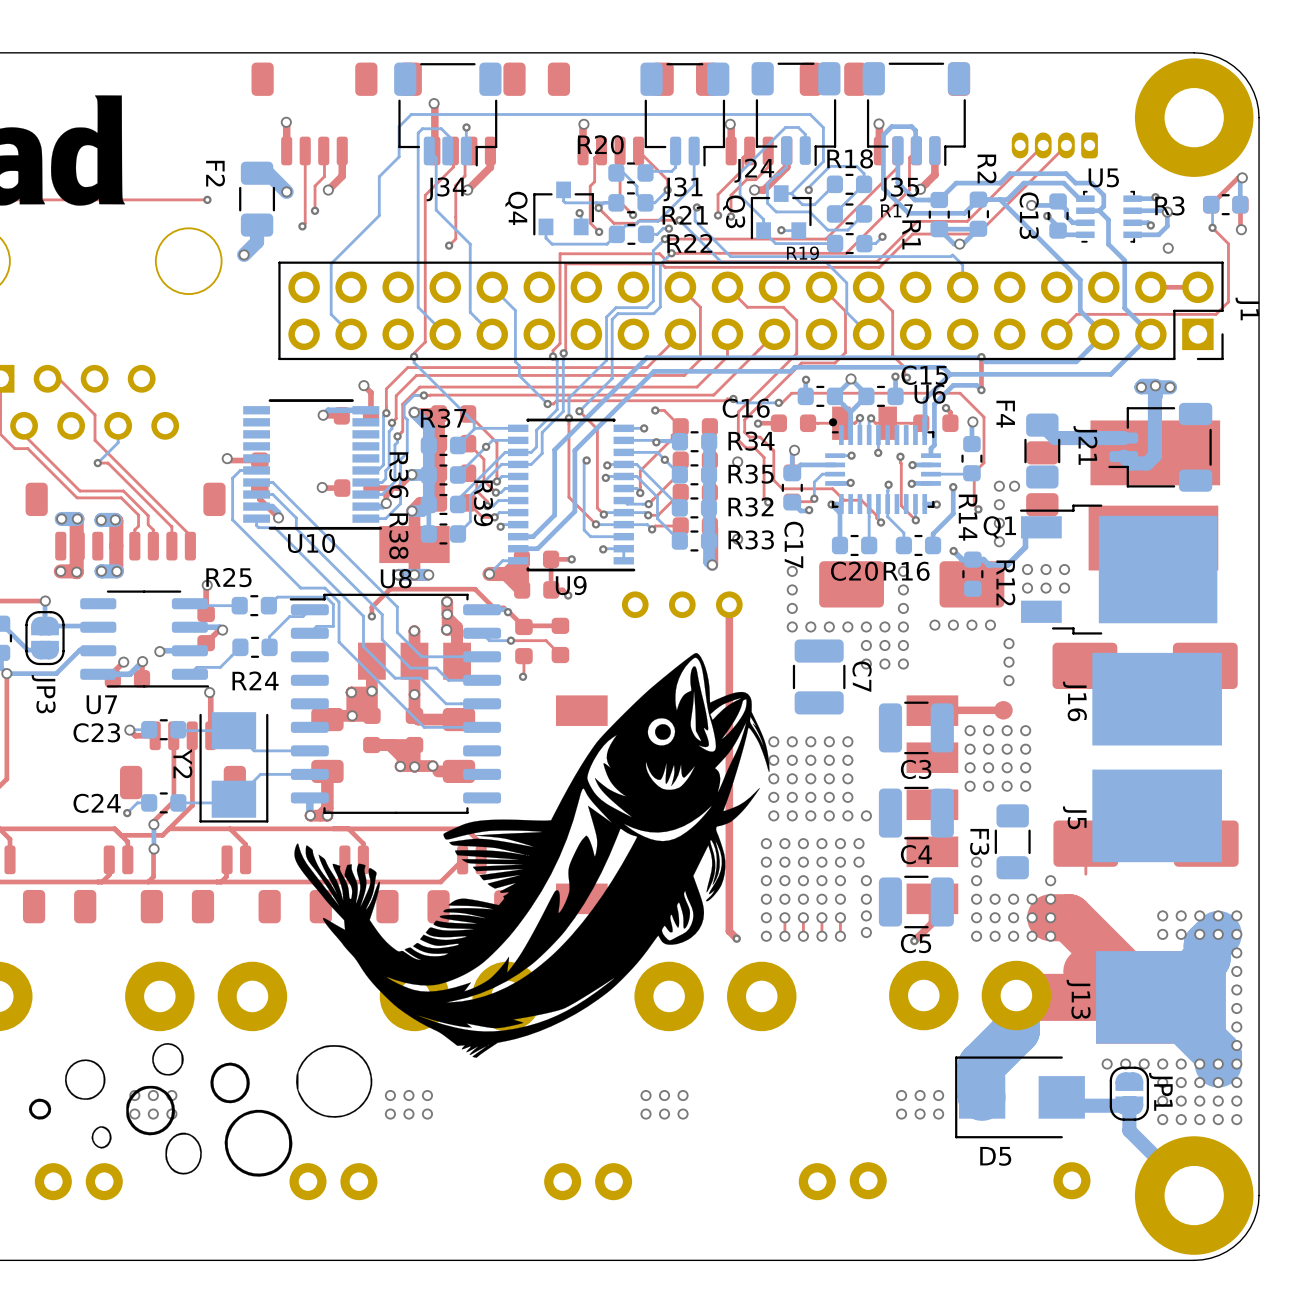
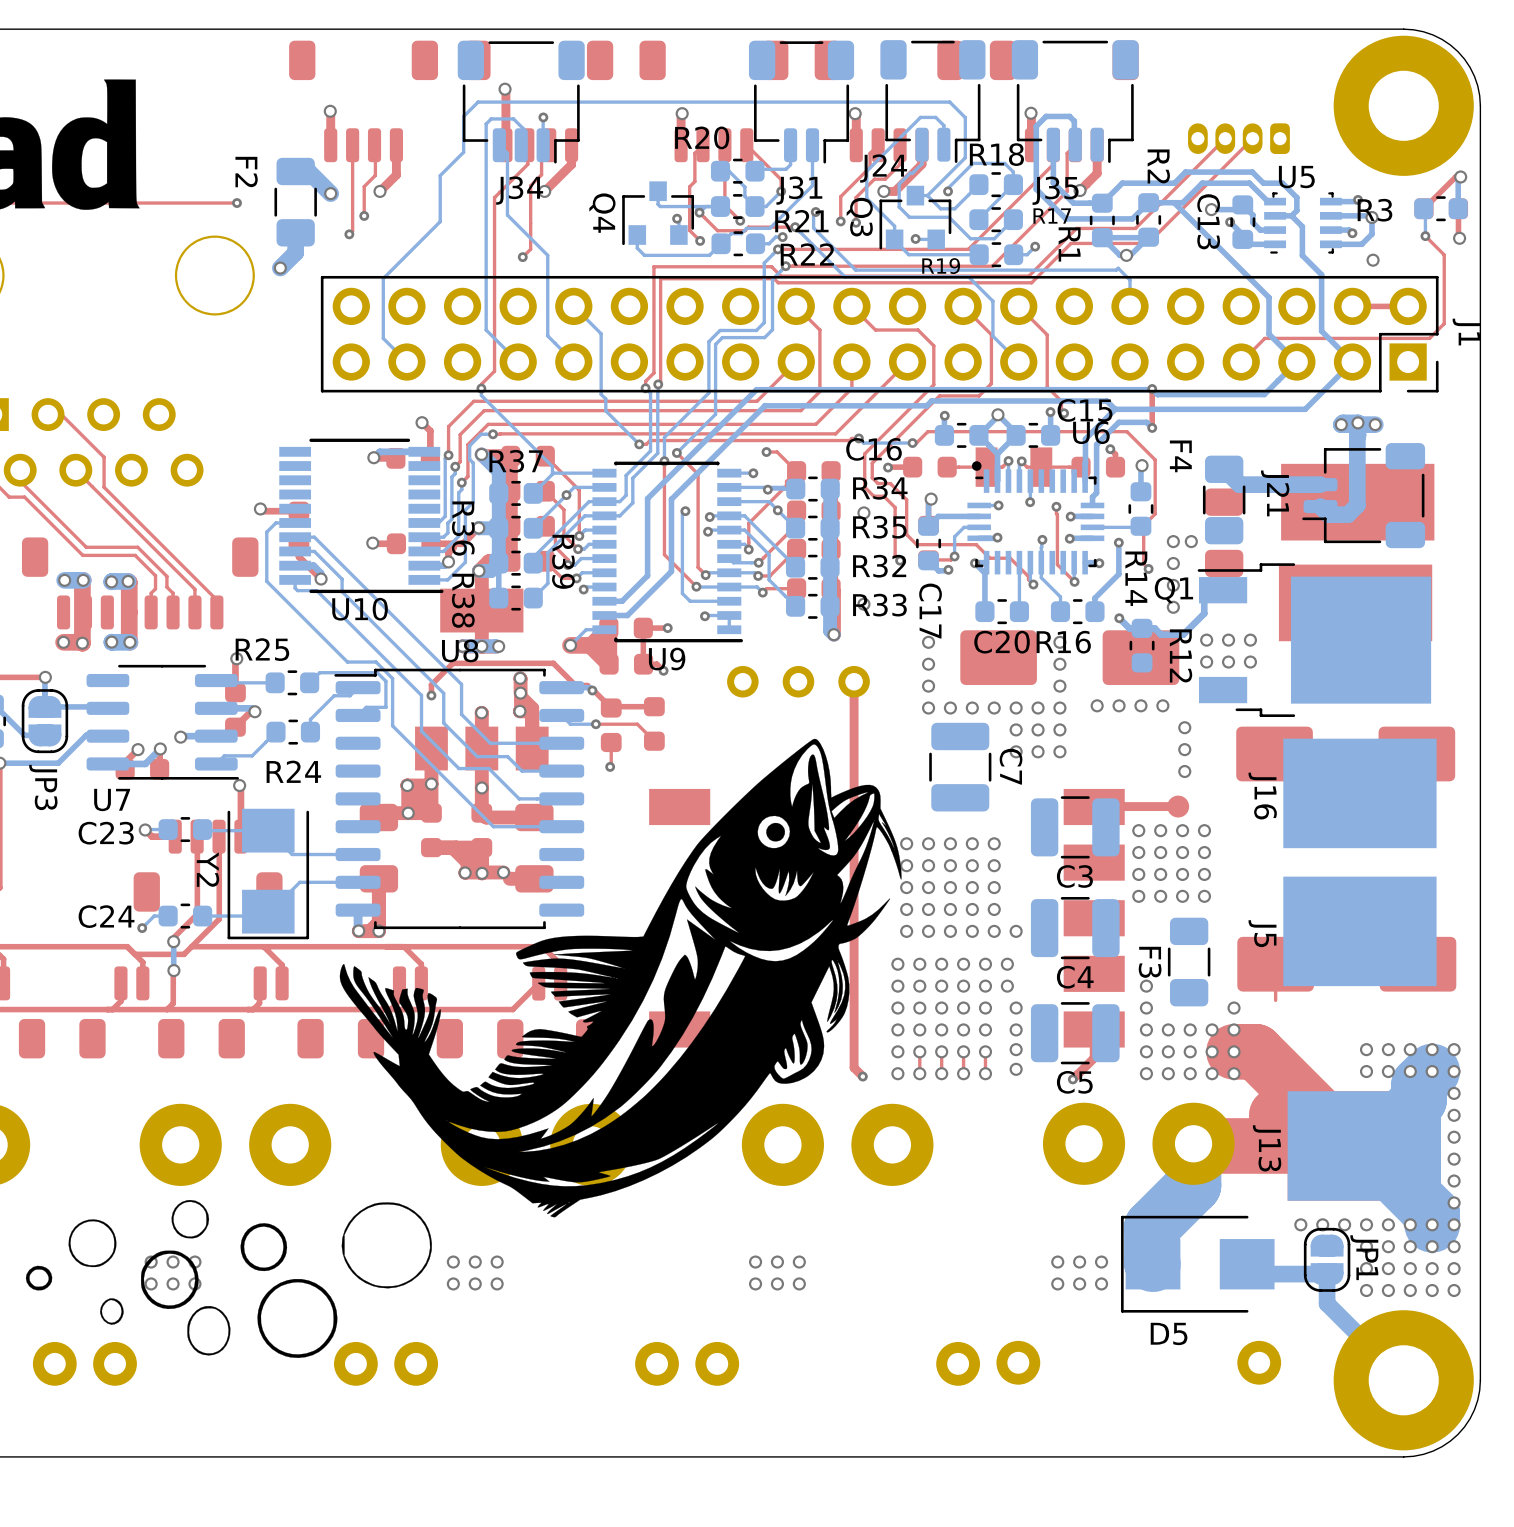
bottom track: (118, 425) (118, 442) (97, 463) -> none
top track: (97, 463) (107, 463) (171, 526) -> (75, 470) (194, 589)
via: (97, 463) -> none

